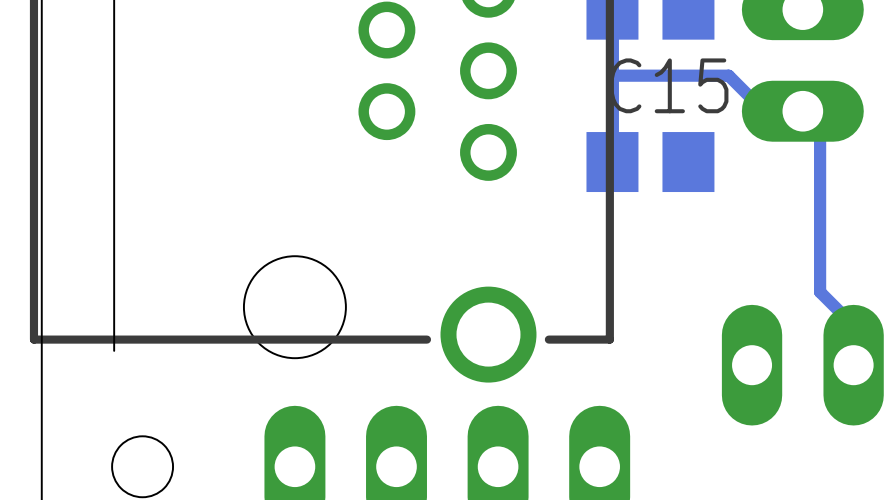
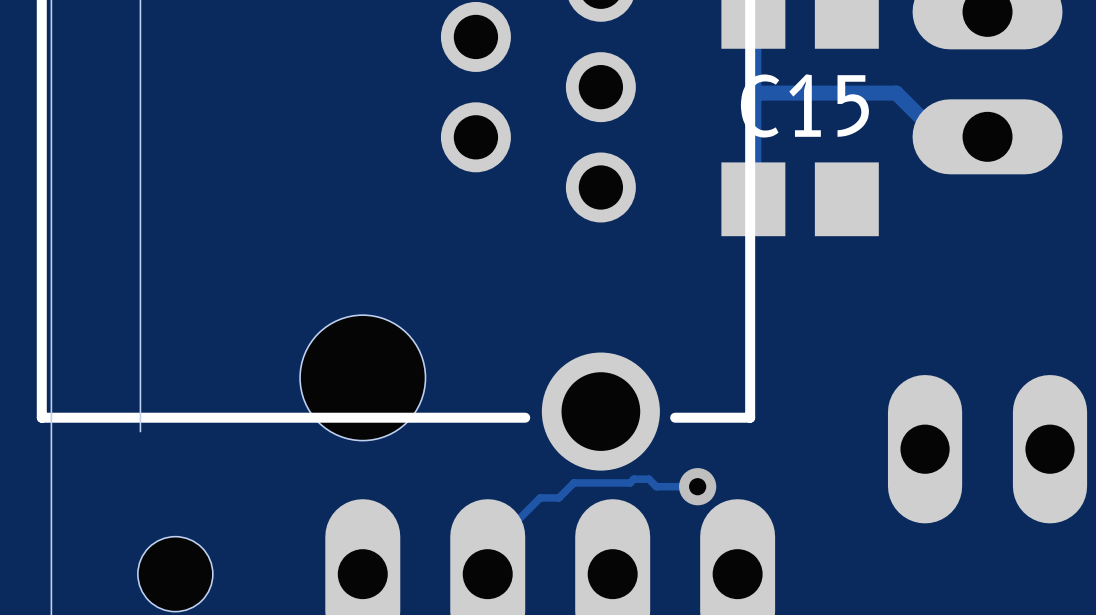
track: (802, 111) (820, 130) (820, 292) (853, 325) (853, 365) -> none
track: none -> (697, 486) (656, 486) (648, 479) (633, 479) (630, 482) (573, 482) (558, 497) (540, 497) (487, 550) (487, 574)
via: none -> (697, 486)

